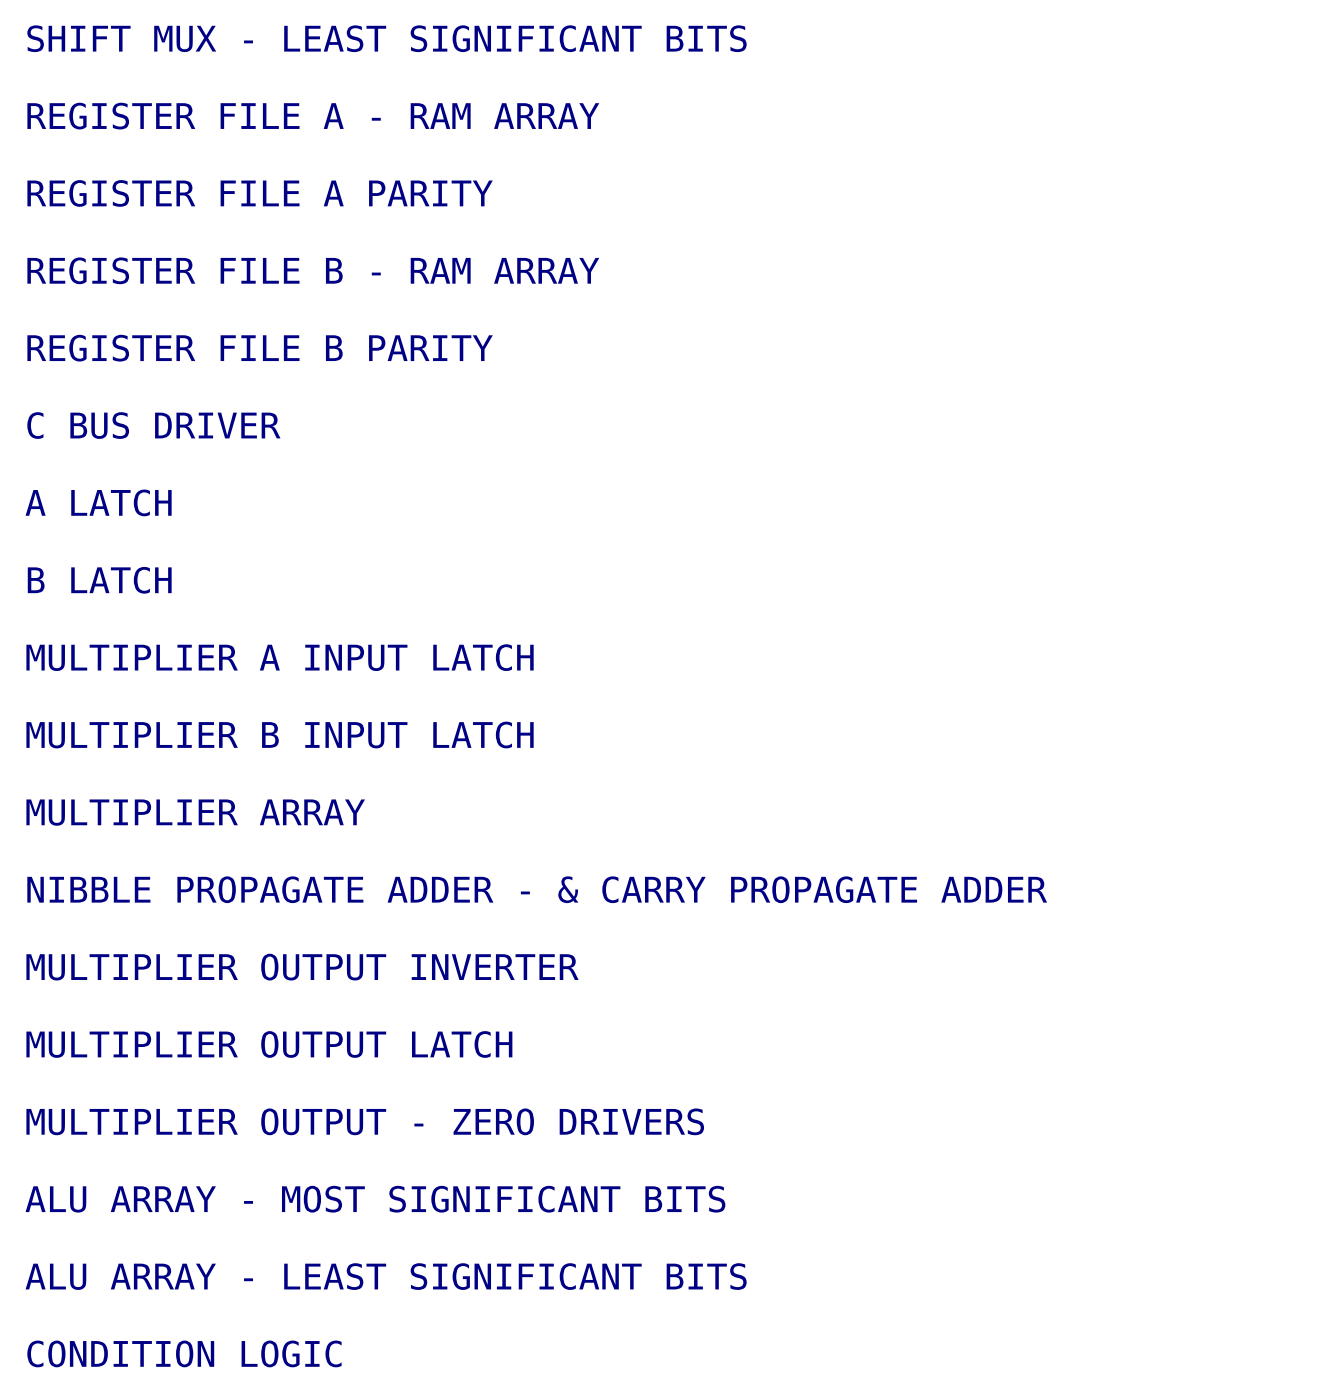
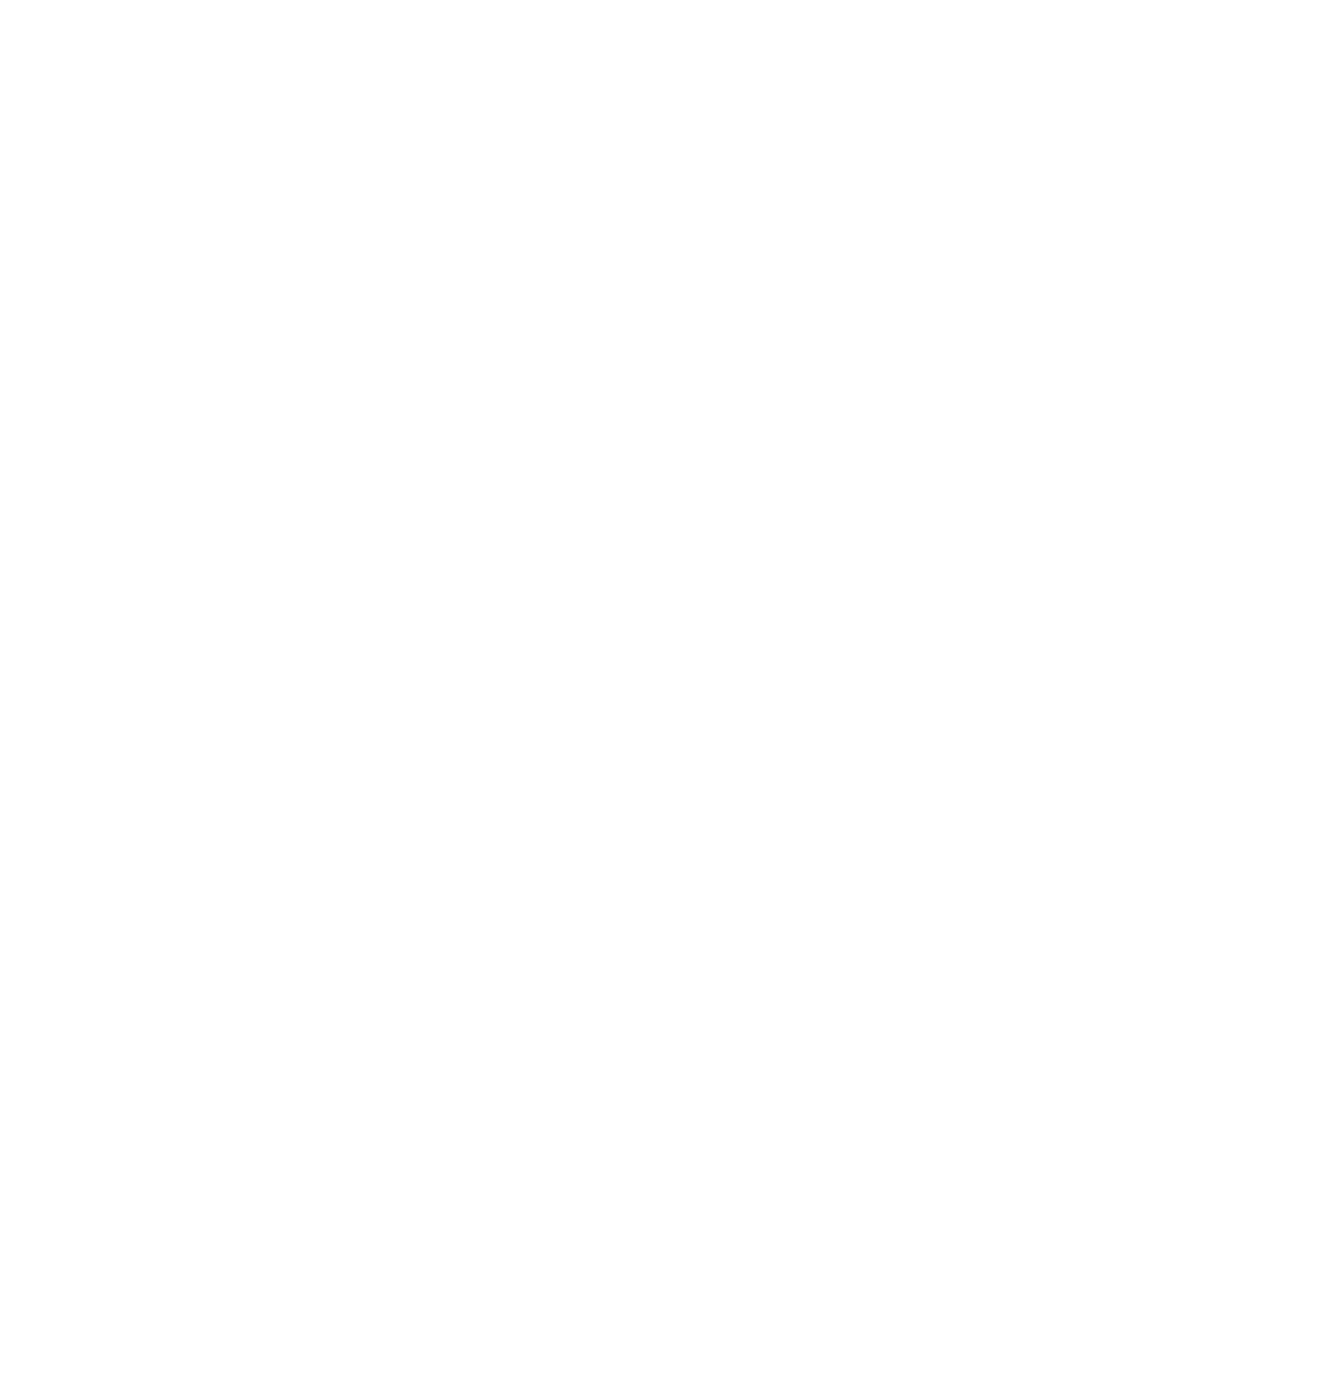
text: SHIFT MUX - LEAST SIGNIFICANT BITS (386, 38) -> none
text: REGISTER FILE A - RAM ARRAY (313, 116) -> none
text: REGISTER FILE A PARITY (260, 193) -> none
text: REGISTER FILE B - RAM ARRAY (313, 270) -> none
text: REGISTER FILE B PARITY (260, 348) -> none
text: C BUS DRIVER (153, 425) -> none
text: A LATCH (98, 502) -> none
text: B LATCH (99, 580) -> none
text: MULTIPLIER A INPUT LATCH (280, 657) -> none
text: MULTIPLIER B INPUT LATCH (280, 735) -> none
text: MULTIPLIER ARRAY (195, 812) -> none
text: NIBBLE PROPAGATE ADDER - & CARRY PROPAGATE ADDER (537, 889) -> none
text: MULTIPLIER OUTPUT INVERTER (302, 967) -> none
text: MULTIPLIER OUTPUT LATCH (269, 1044) -> none
text: MULTIPLIER OUTPUT - ZERO DRIVERS (365, 1121) -> none
text: ALU ARRAY - MOST SIGNIFICANT BITS (375, 1199) -> none
text: ALU ARRAY - LEAST SIGNIFICANT BITS (386, 1276) -> none
text: CONDITION LOGIC (184, 1353) -> none

